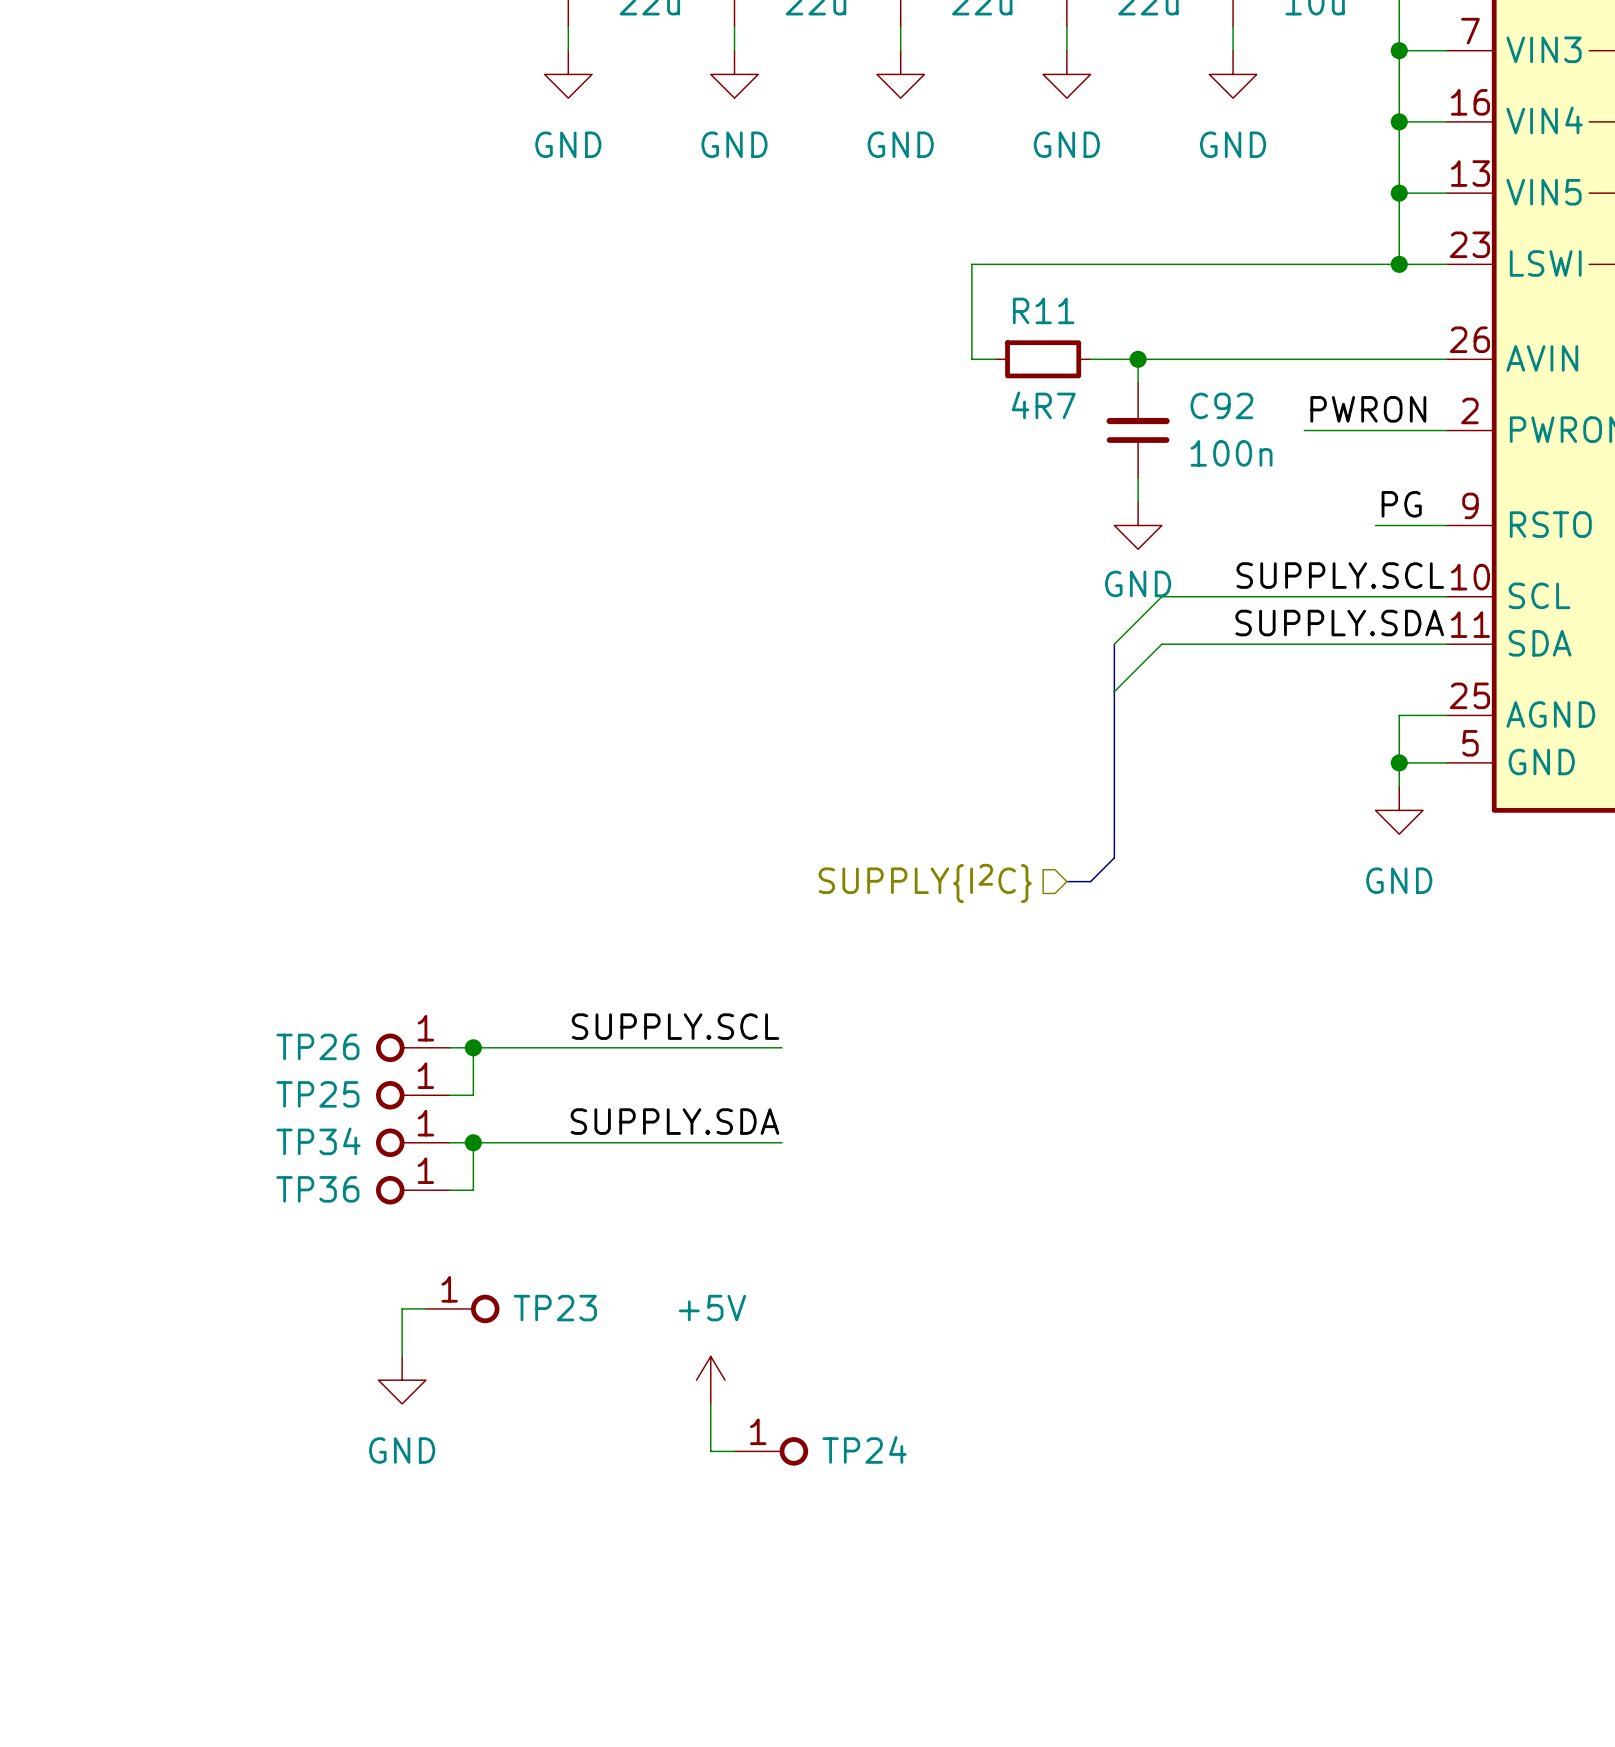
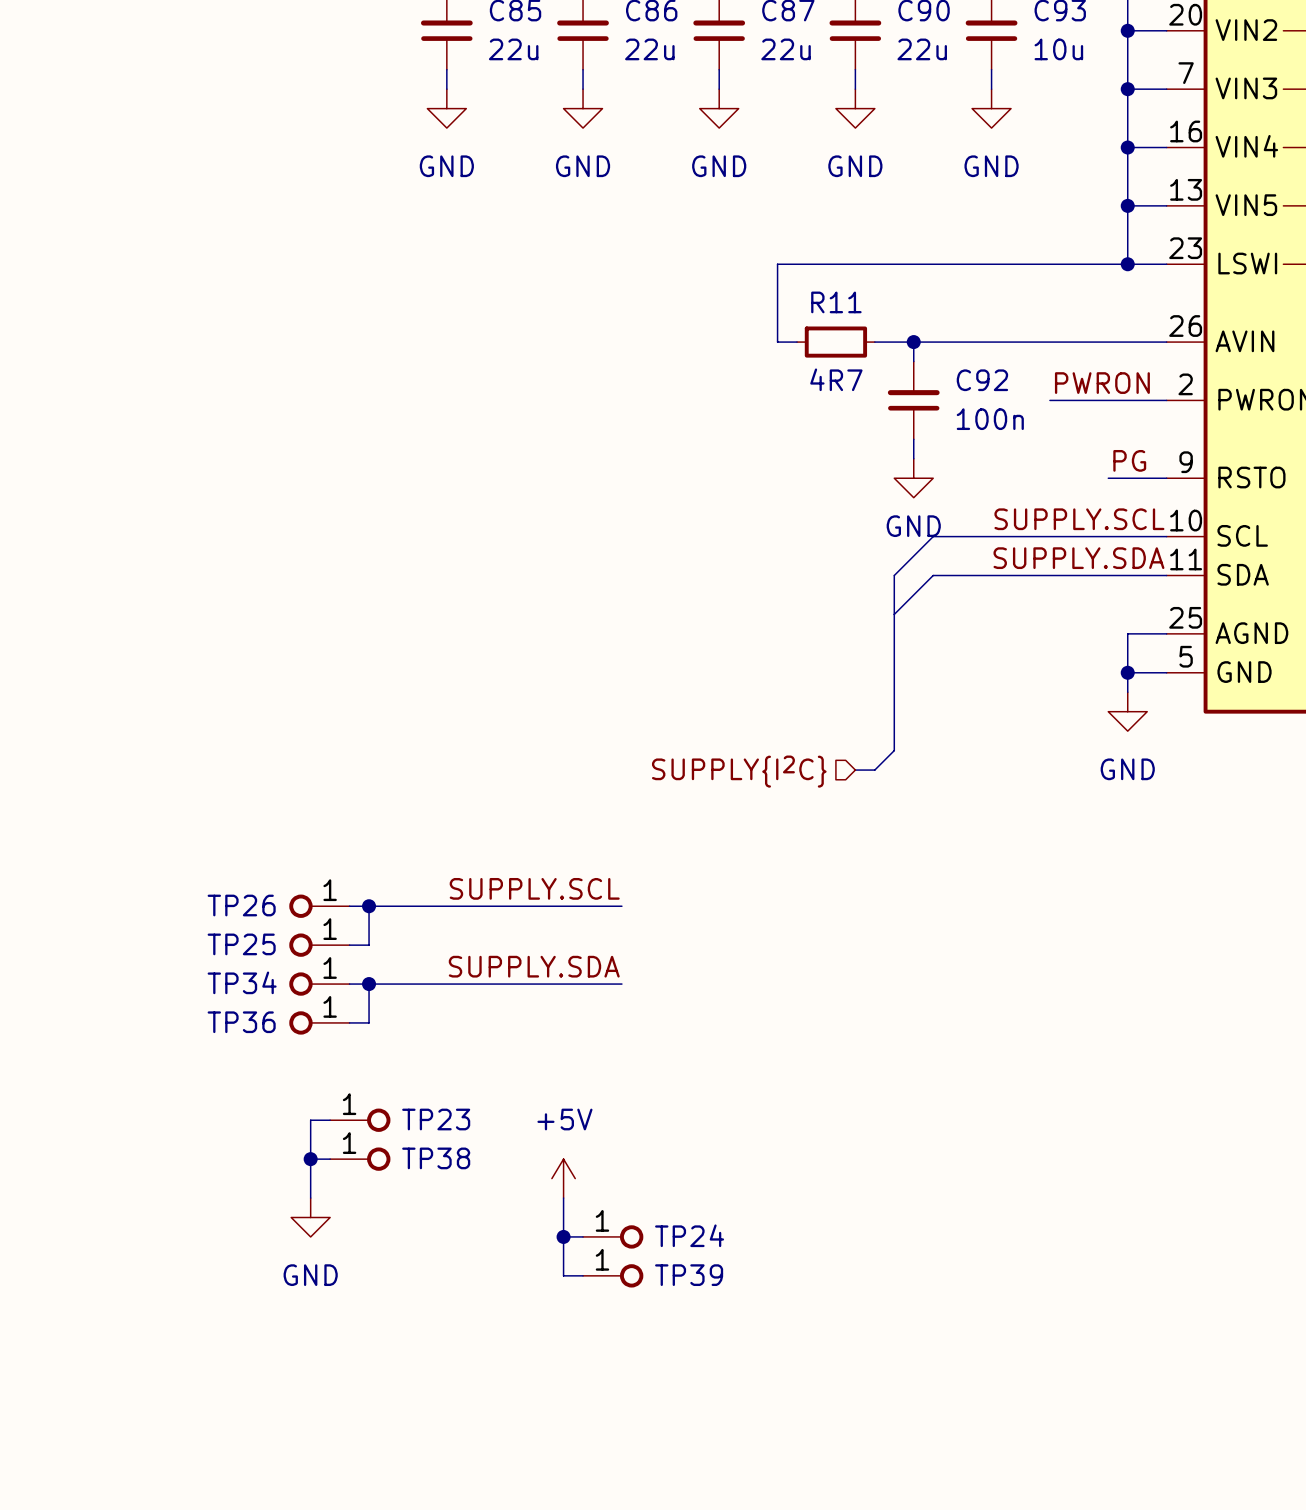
junction: none -> (310, 1159)
wire: none -> (330, 1159) (310, 1159) (310, 1198)
TP38: none -> (360, 1159)
power symbol position: GND (402, 1380) -> GND (310, 1217)
wire: none -> (563, 1236) (563, 1275) (583, 1275)
junction: none -> (563, 1236)
TP39: none -> (613, 1275)

